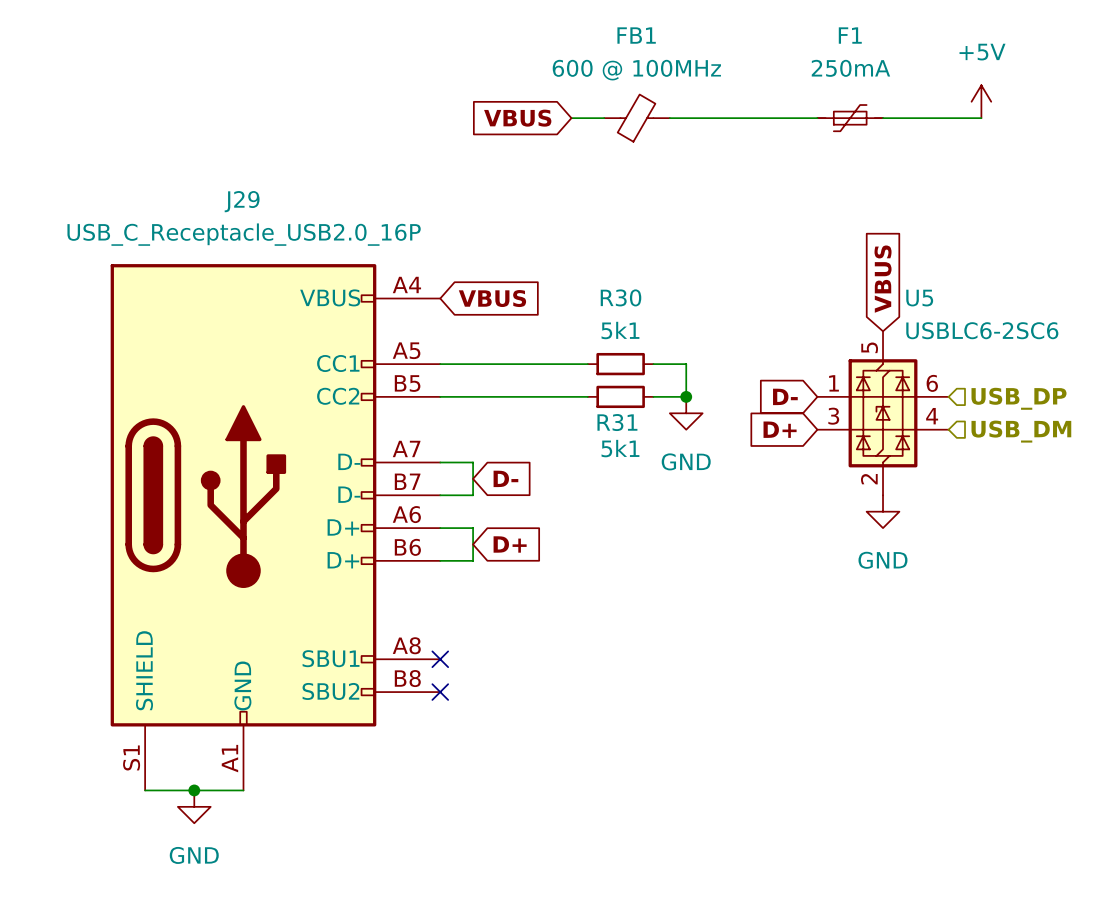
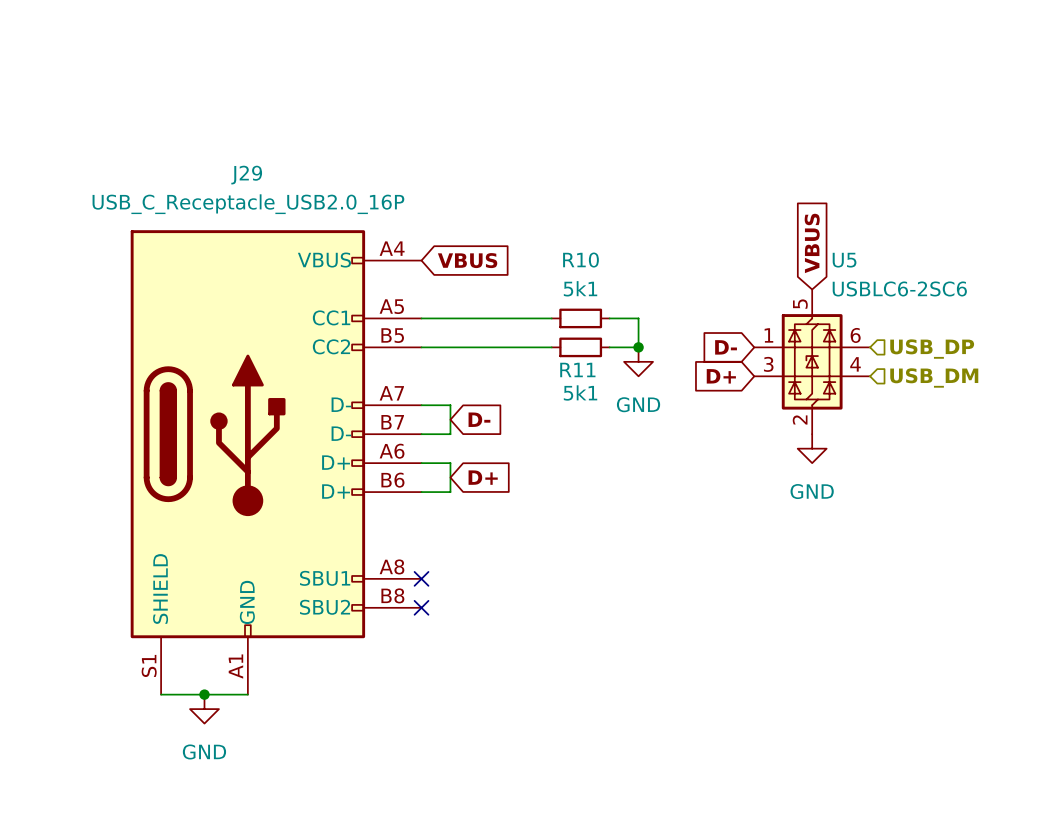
power symbol: +5V (981, 101) -> none
global label: VBUS (517, 118) -> none
wire: (571, 118) (604, 118) -> none
FB1: 600 @ 100MHz (637, 118) -> none
wire: (669, 118) (817, 118) -> none
F1: 250mA (850, 118) -> none
wire: (883, 118) (981, 118) -> none
R30 name: R30 (621, 297) -> R10 (580, 260)
R31 name: R31 (617, 422) -> R11 (577, 369)

